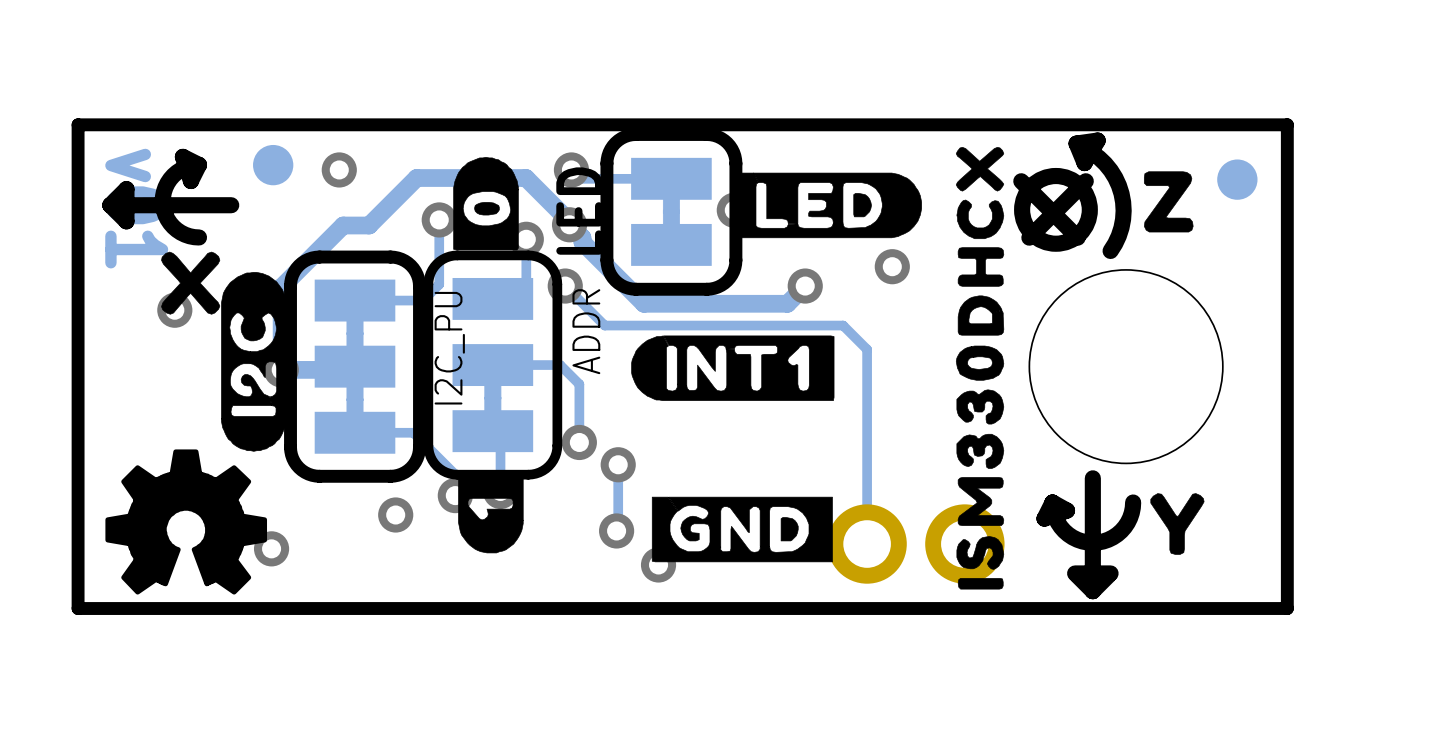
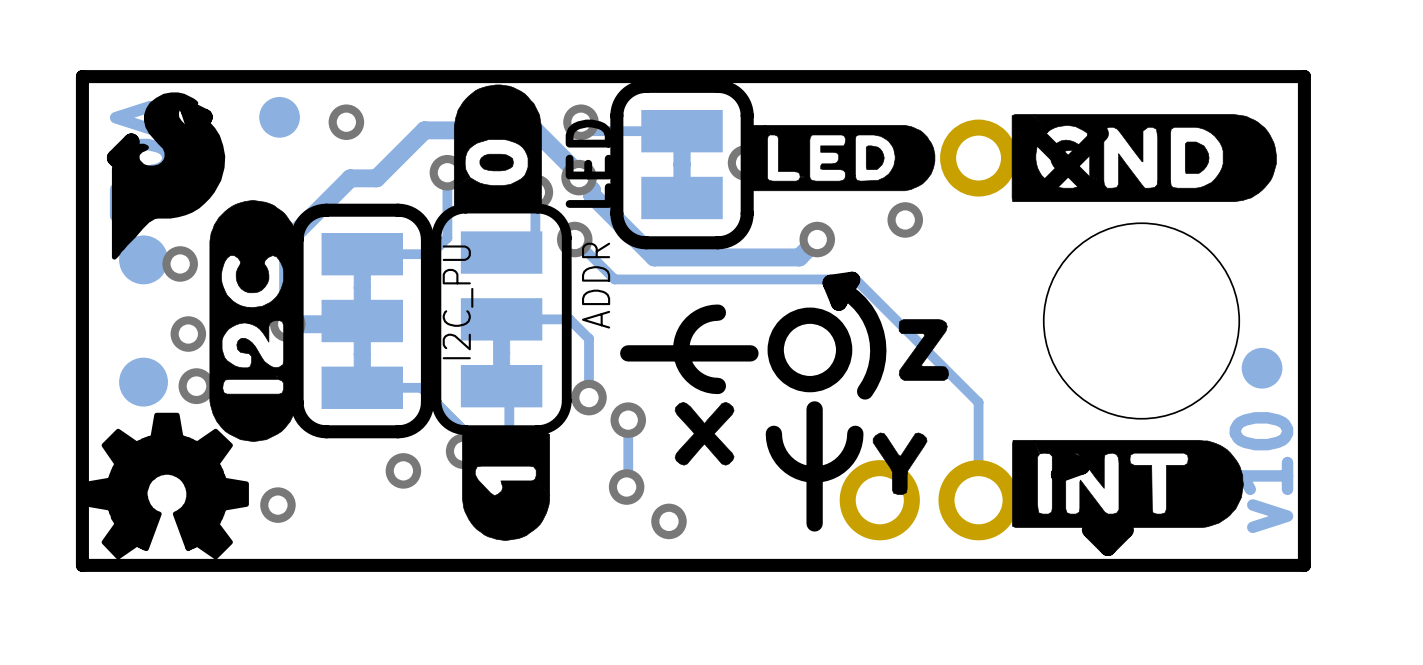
drawing: none -> [111, 92, 226, 260]
line: (1097, 140) (1076, 143) (1084, 163) (1097, 140) -> (852, 279) (830, 282) (838, 302) (852, 279)
drawing: [955, 147, 1005, 590] -> none
line: (1084, 148) (1099, 157) (1110, 170) (1121, 193) (1123, 219) (1118, 235) (1110, 250) -> (839, 288) (853, 297) (865, 310) (876, 333) (877, 359) (873, 376) (865, 391)
drawing shape: [453, 156, 519, 251] -> [453, 84, 542, 210]
drawing: none -> [1011, 114, 1277, 203]
line: (199, 164) (185, 167) (173, 175) (165, 187) (162, 201) (165, 215) (173, 226) (185, 234) (199, 237) -> (717, 312) (703, 315) (691, 323) (684, 335) (681, 349) (684, 363) (691, 375) (703, 383) (717, 385)
part position: (1237, 179) -> (1262, 368)
drawing position: (1168, 201) -> (923, 350)
line: (231, 205) (110, 205) -> (750, 353) (628, 353)
part: none -> (978, 158)
drawing position: (1055, 209) -> (809, 349)
drawing shape: [221, 272, 287, 452] -> [209, 200, 298, 442]
drawing position: (190, 283) -> (704, 433)
part: none -> (143, 259)
drawing: [631, 335, 835, 401] -> none
track: (867, 349) (867, 544) -> (879, 303) (978, 402) (978, 483)
via: none -> (188, 334)
part: none -> (143, 382)
via: none -> (196, 386)
drawing shape: [458, 473, 524, 554] -> [462, 432, 550, 541]
line: (1092, 478) (1092, 591) -> (814, 409) (814, 523)
drawing: none -> [1012, 439, 1244, 528]
drawing: [651, 496, 833, 563] -> none
line: (1133, 502) (1130, 517) (1121, 531) (1108, 539) (1092, 542) (1077, 539) (1064, 531) (1055, 517) (1052, 502) -> (855, 433) (852, 449) (843, 462) (830, 471) (814, 474) (799, 471) (785, 462) (776, 449) (773, 433)
text: none -> v10 (1261, 472)
drawing position: (186, 521) -> (167, 486)
drawing position: (1177, 524) -> (900, 463)

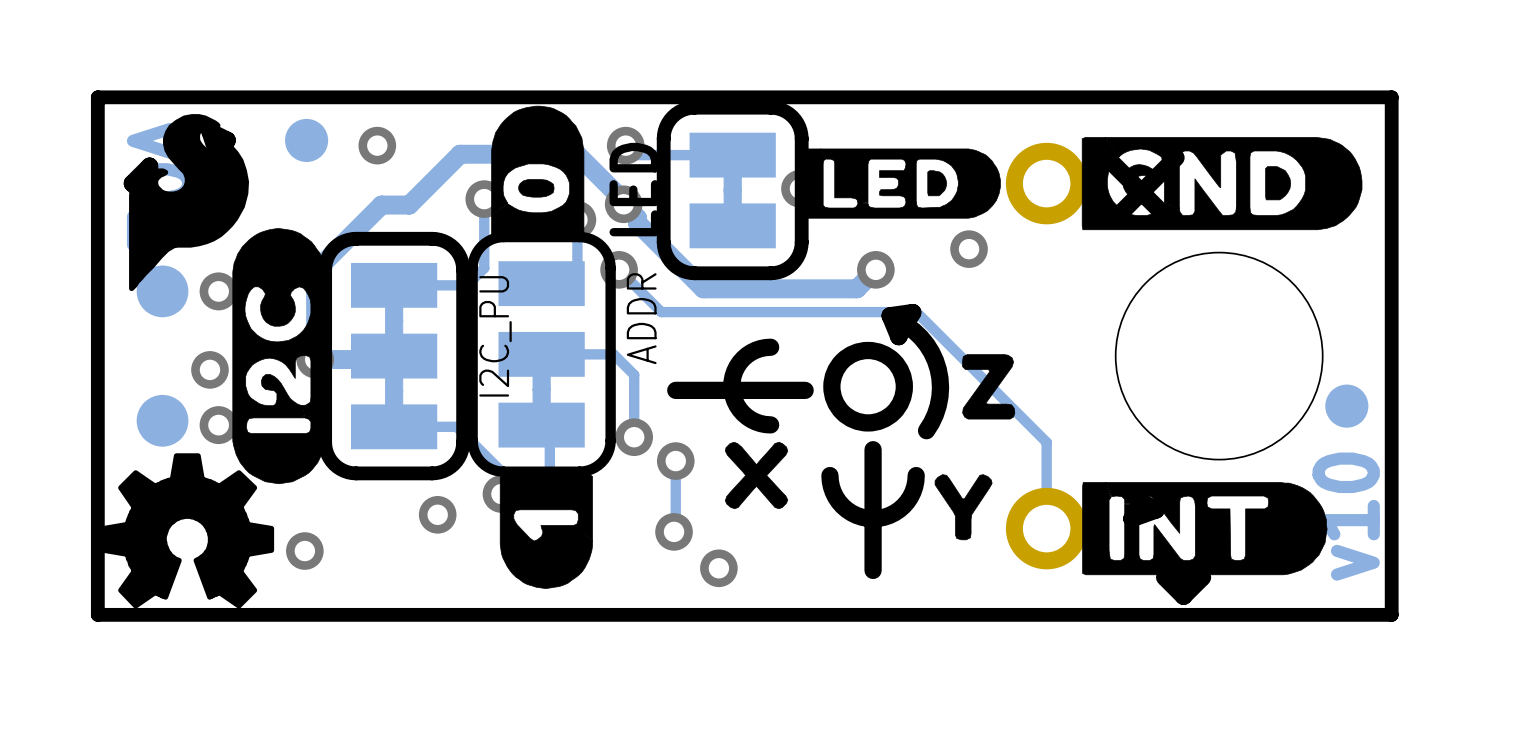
via position: (180, 263) -> (218, 291)
part footprint: [839, 460, 1019, 541] -> [1005, 487, 1088, 570]

